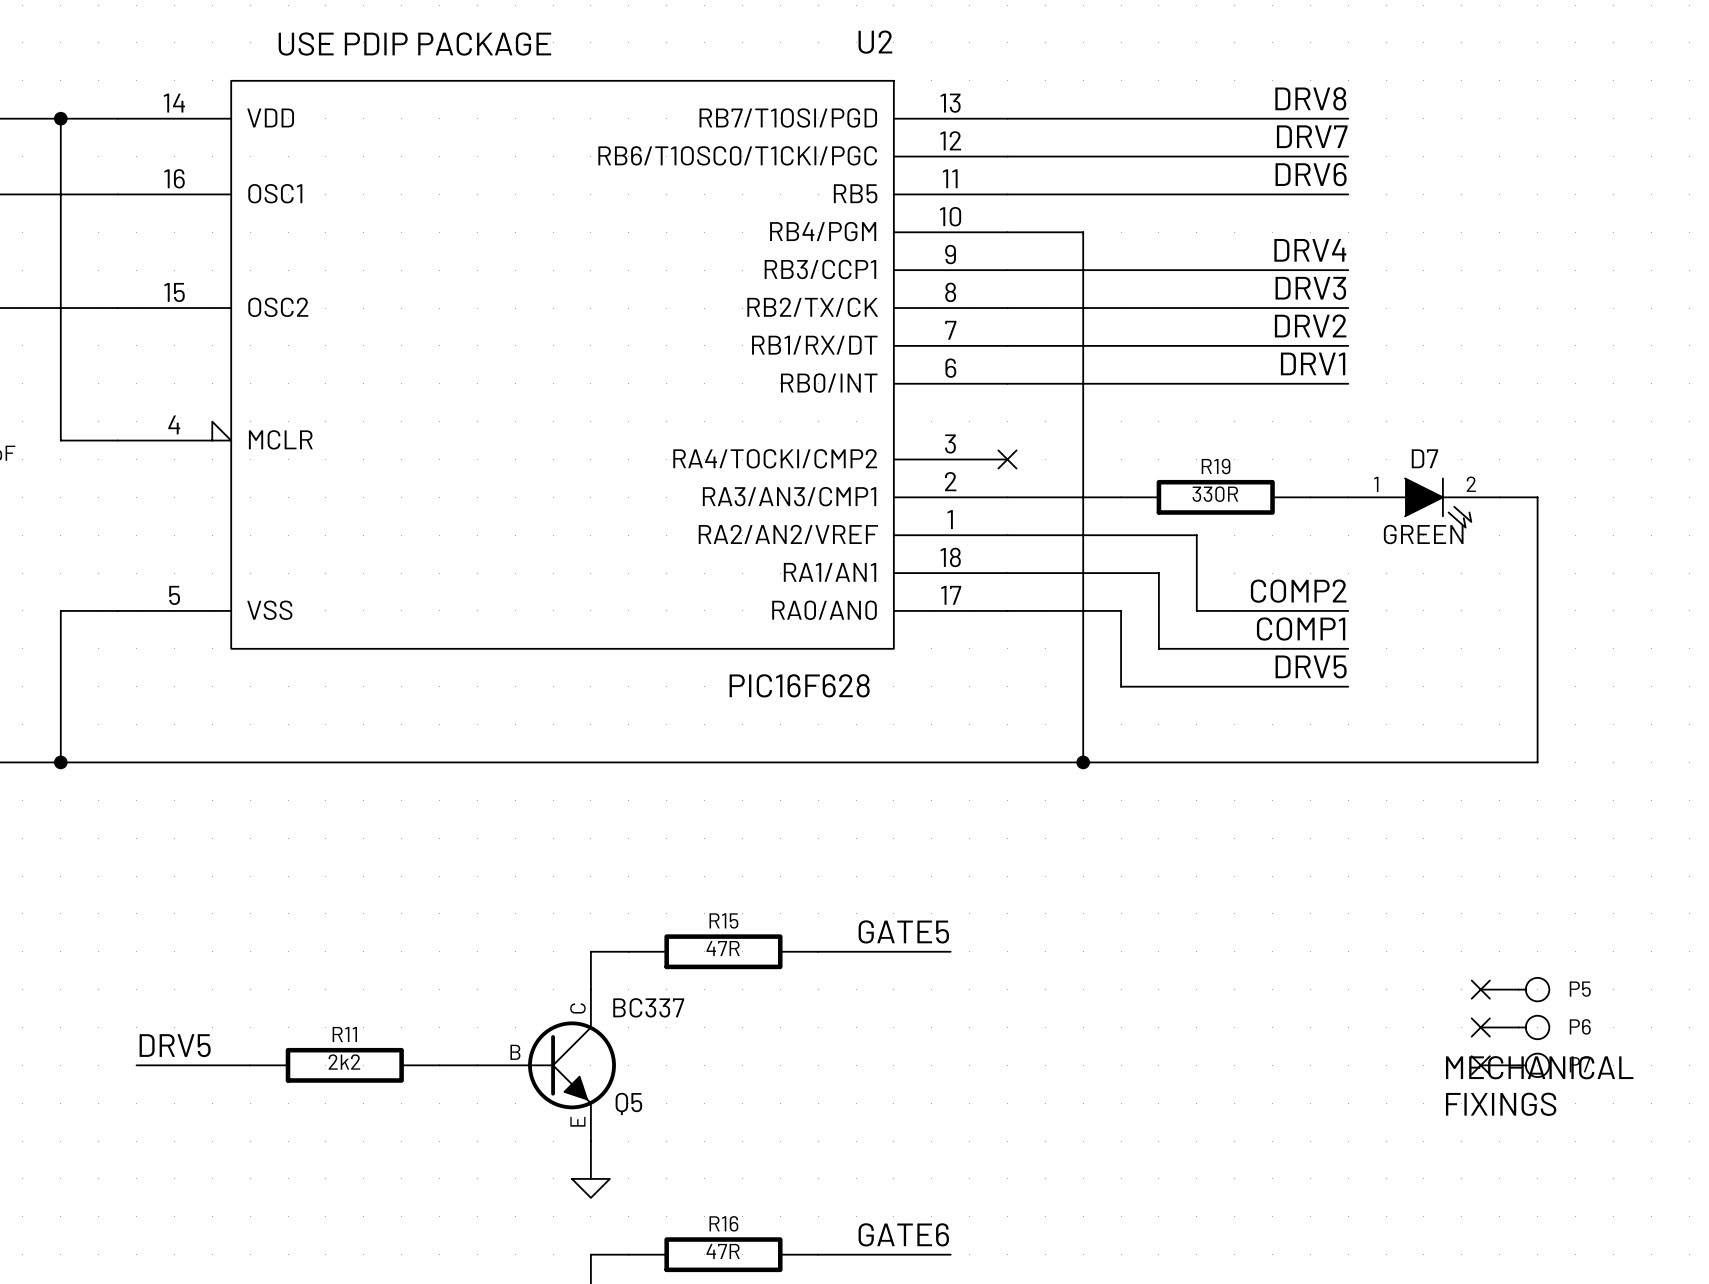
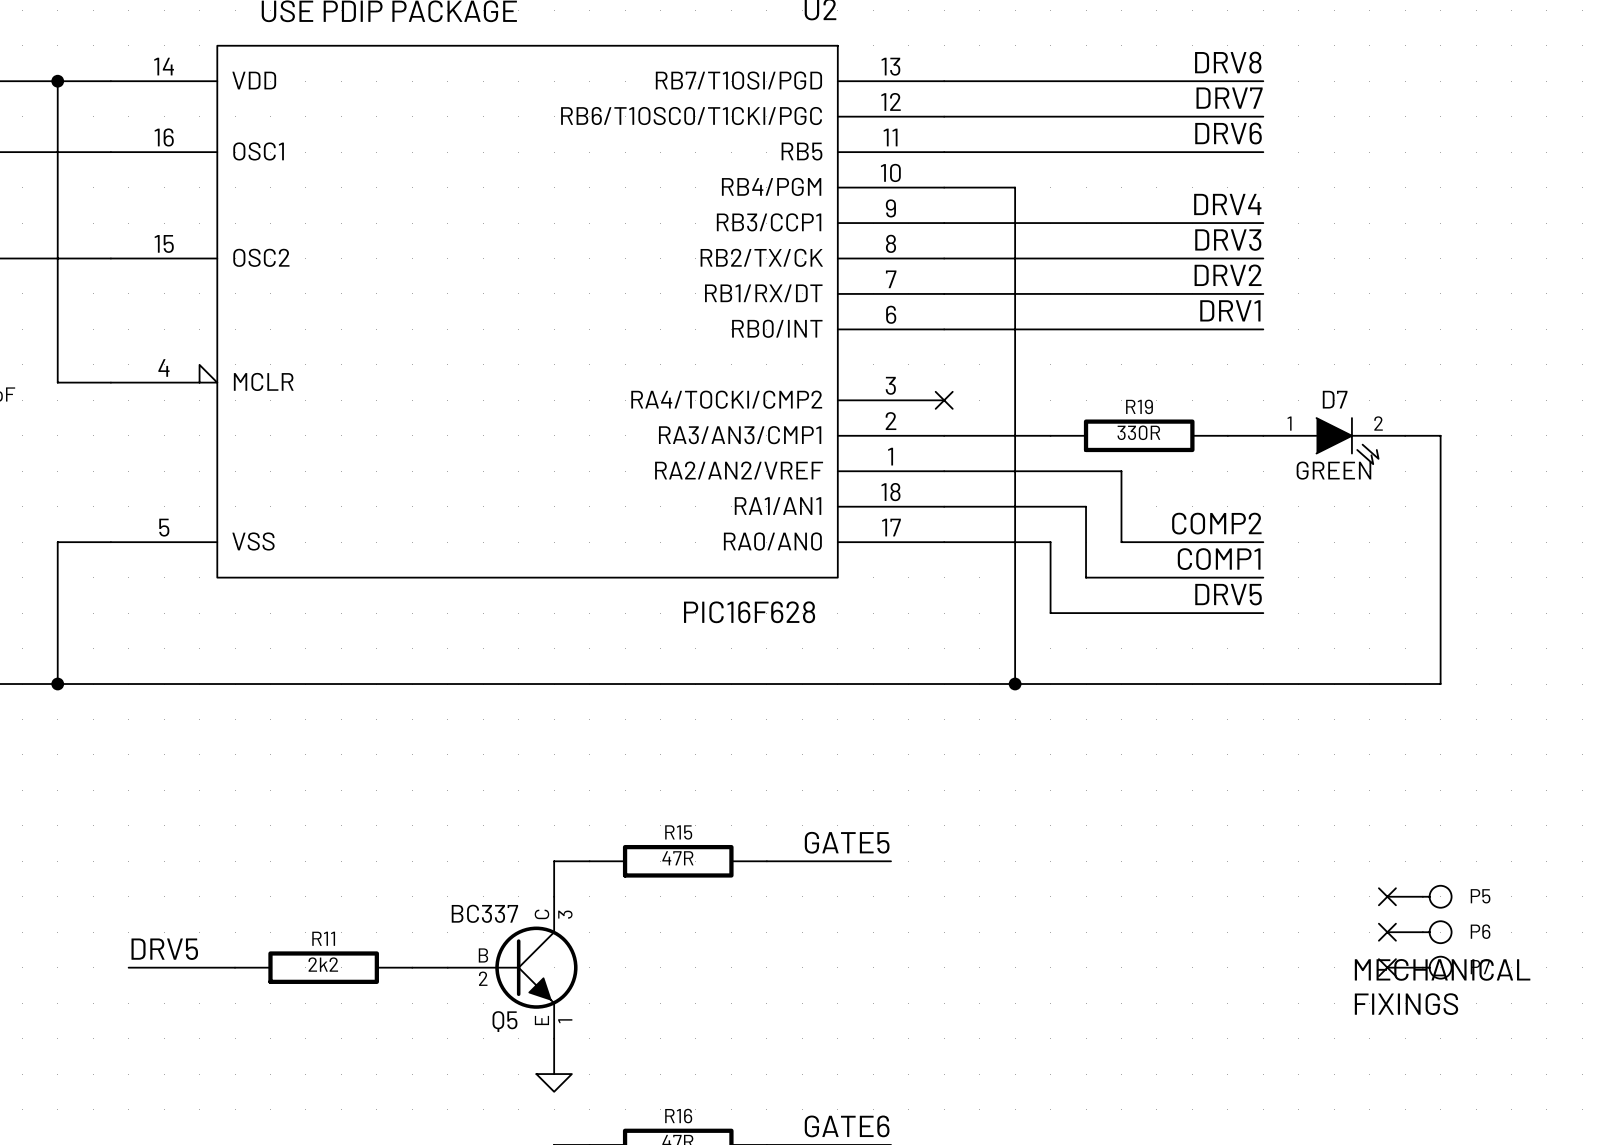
Q5 value position: BC337 (648, 1007) -> BC337 (484, 913)
Q5 pin number: C (577, 1008) -> 3 (565, 914)
Q5 pin number: B (515, 1052) -> 2 (483, 978)
Q5 name position: Q5 (628, 1103) -> Q5 (504, 1021)
Q5 pin number: E (577, 1121) -> 1 (565, 1021)

